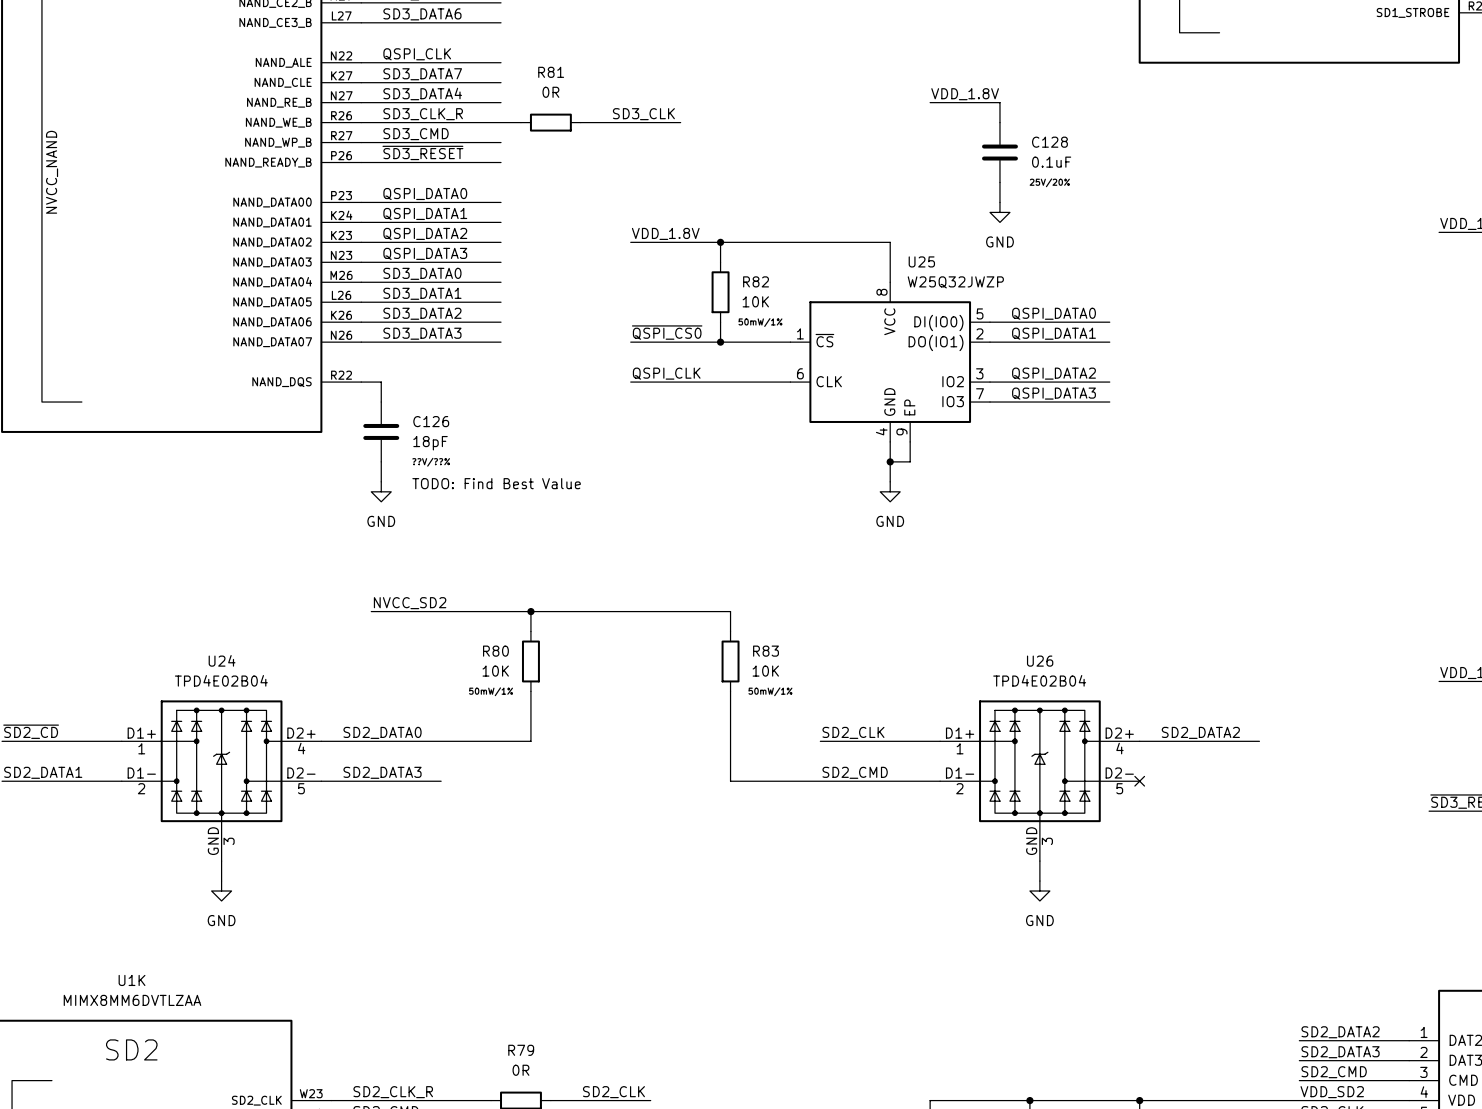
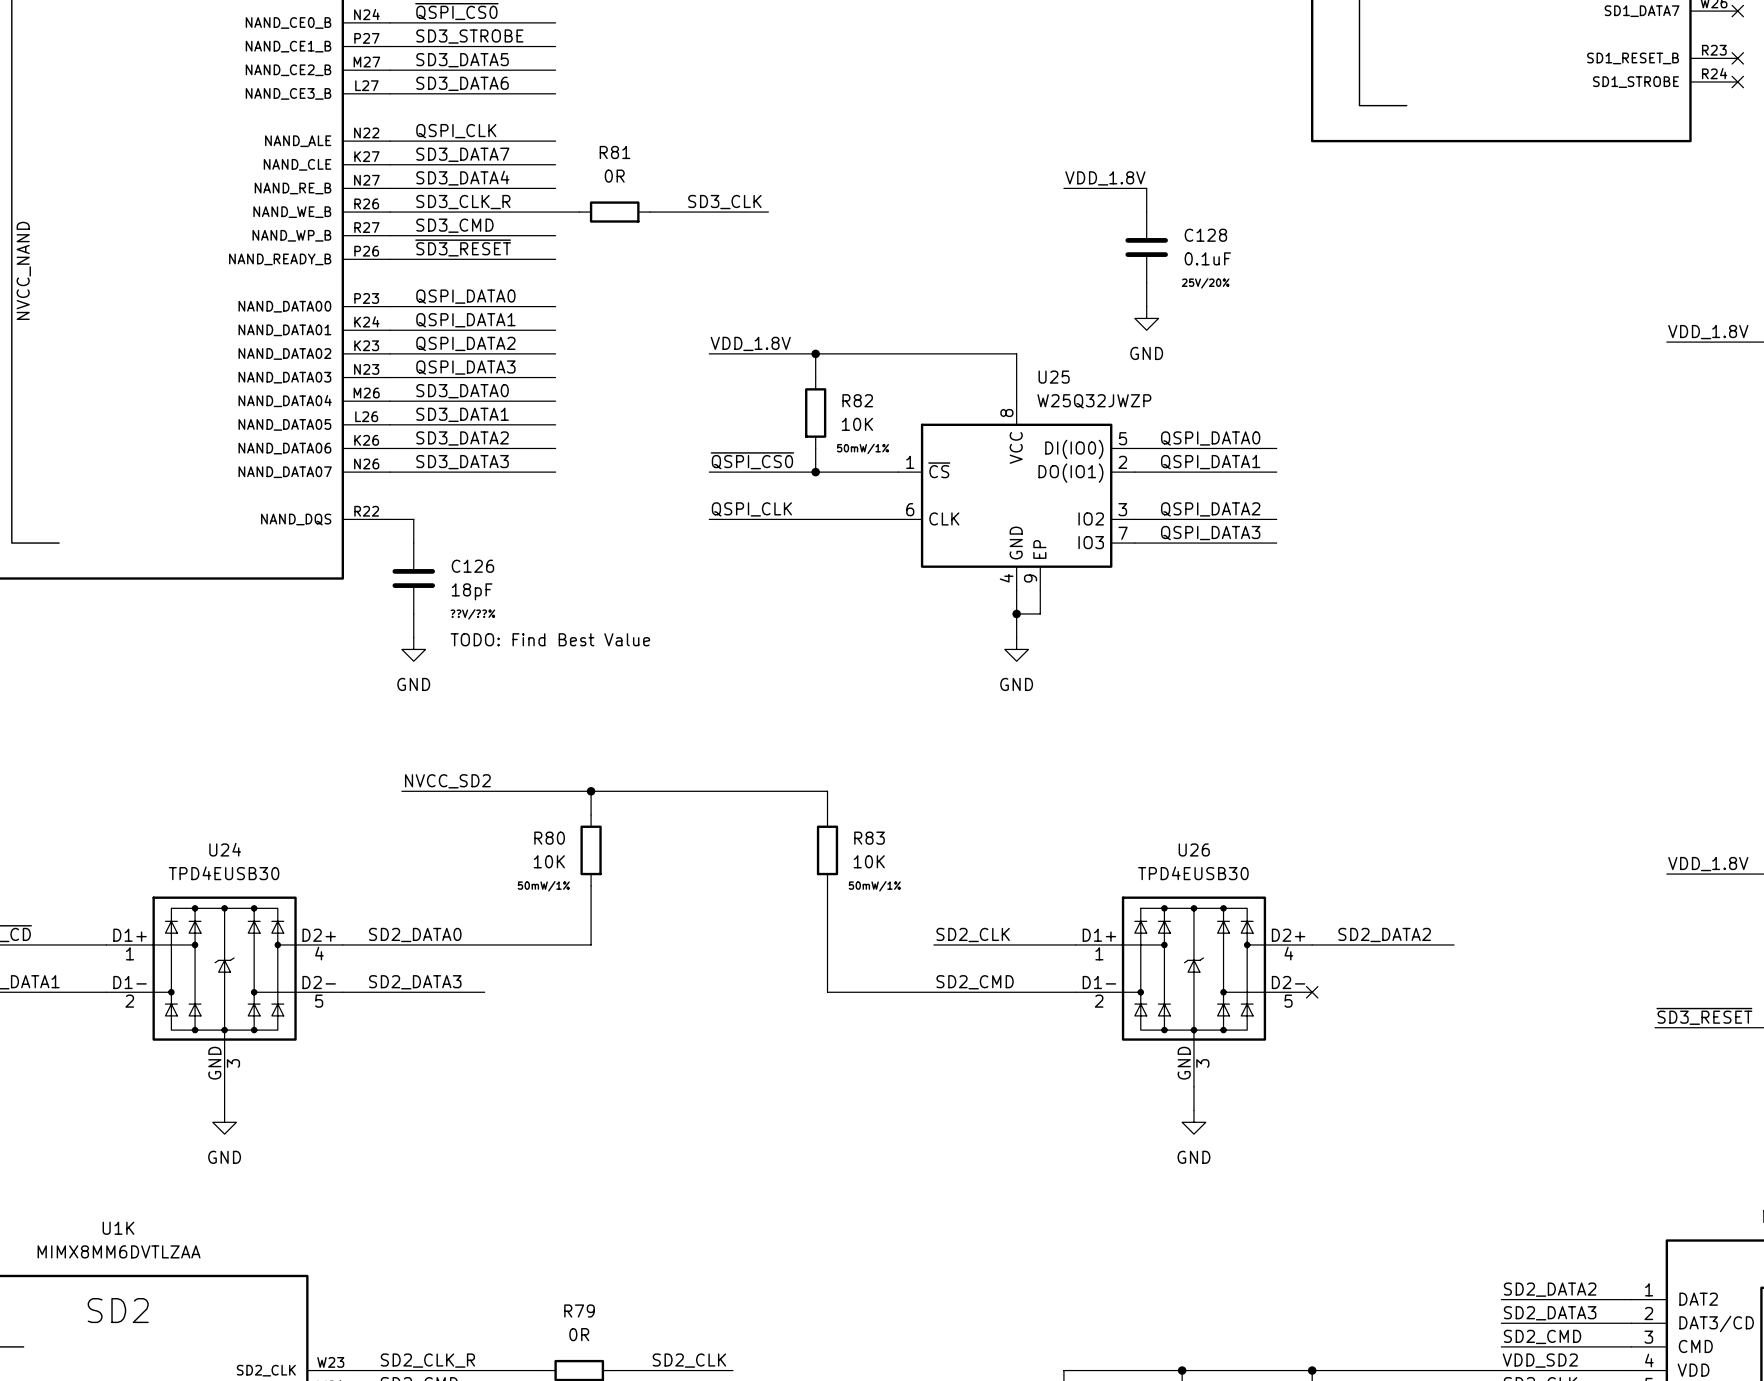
U24 value: TPD4E02B04 (221, 680) -> TPD4EUSB30 (224, 873)
U26 value: TPD4E02B04 (1039, 680) -> TPD4EUSB30 (1193, 873)

